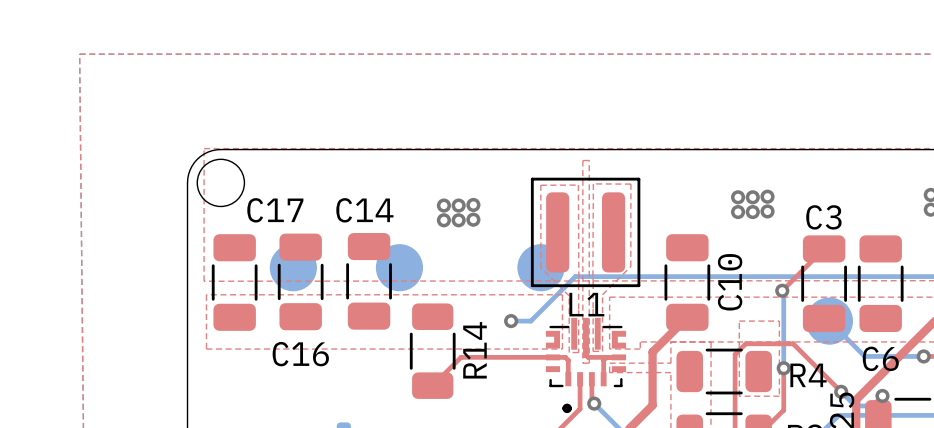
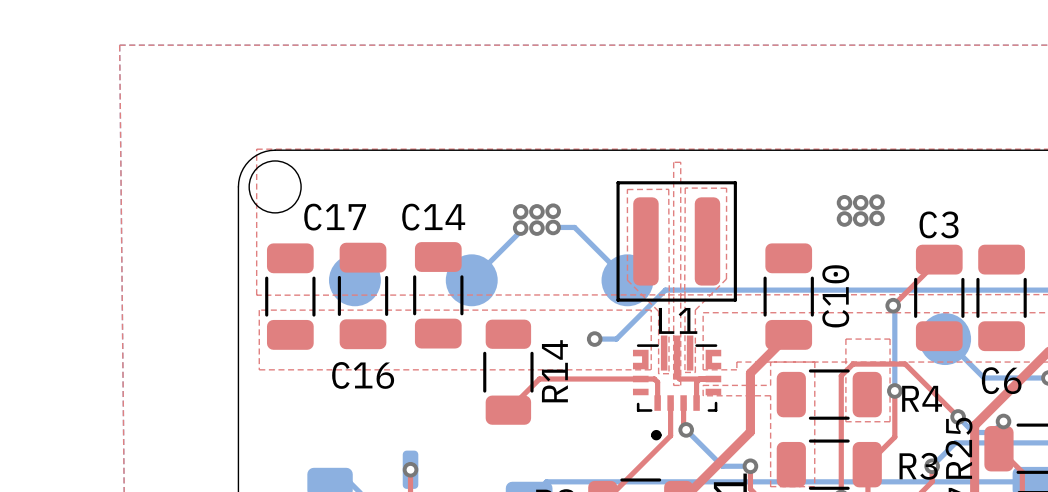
bottom track: none -> (553, 227) (574, 227) (627, 280)
bottom track: none -> (520, 228) (520, 231) (471, 280)

